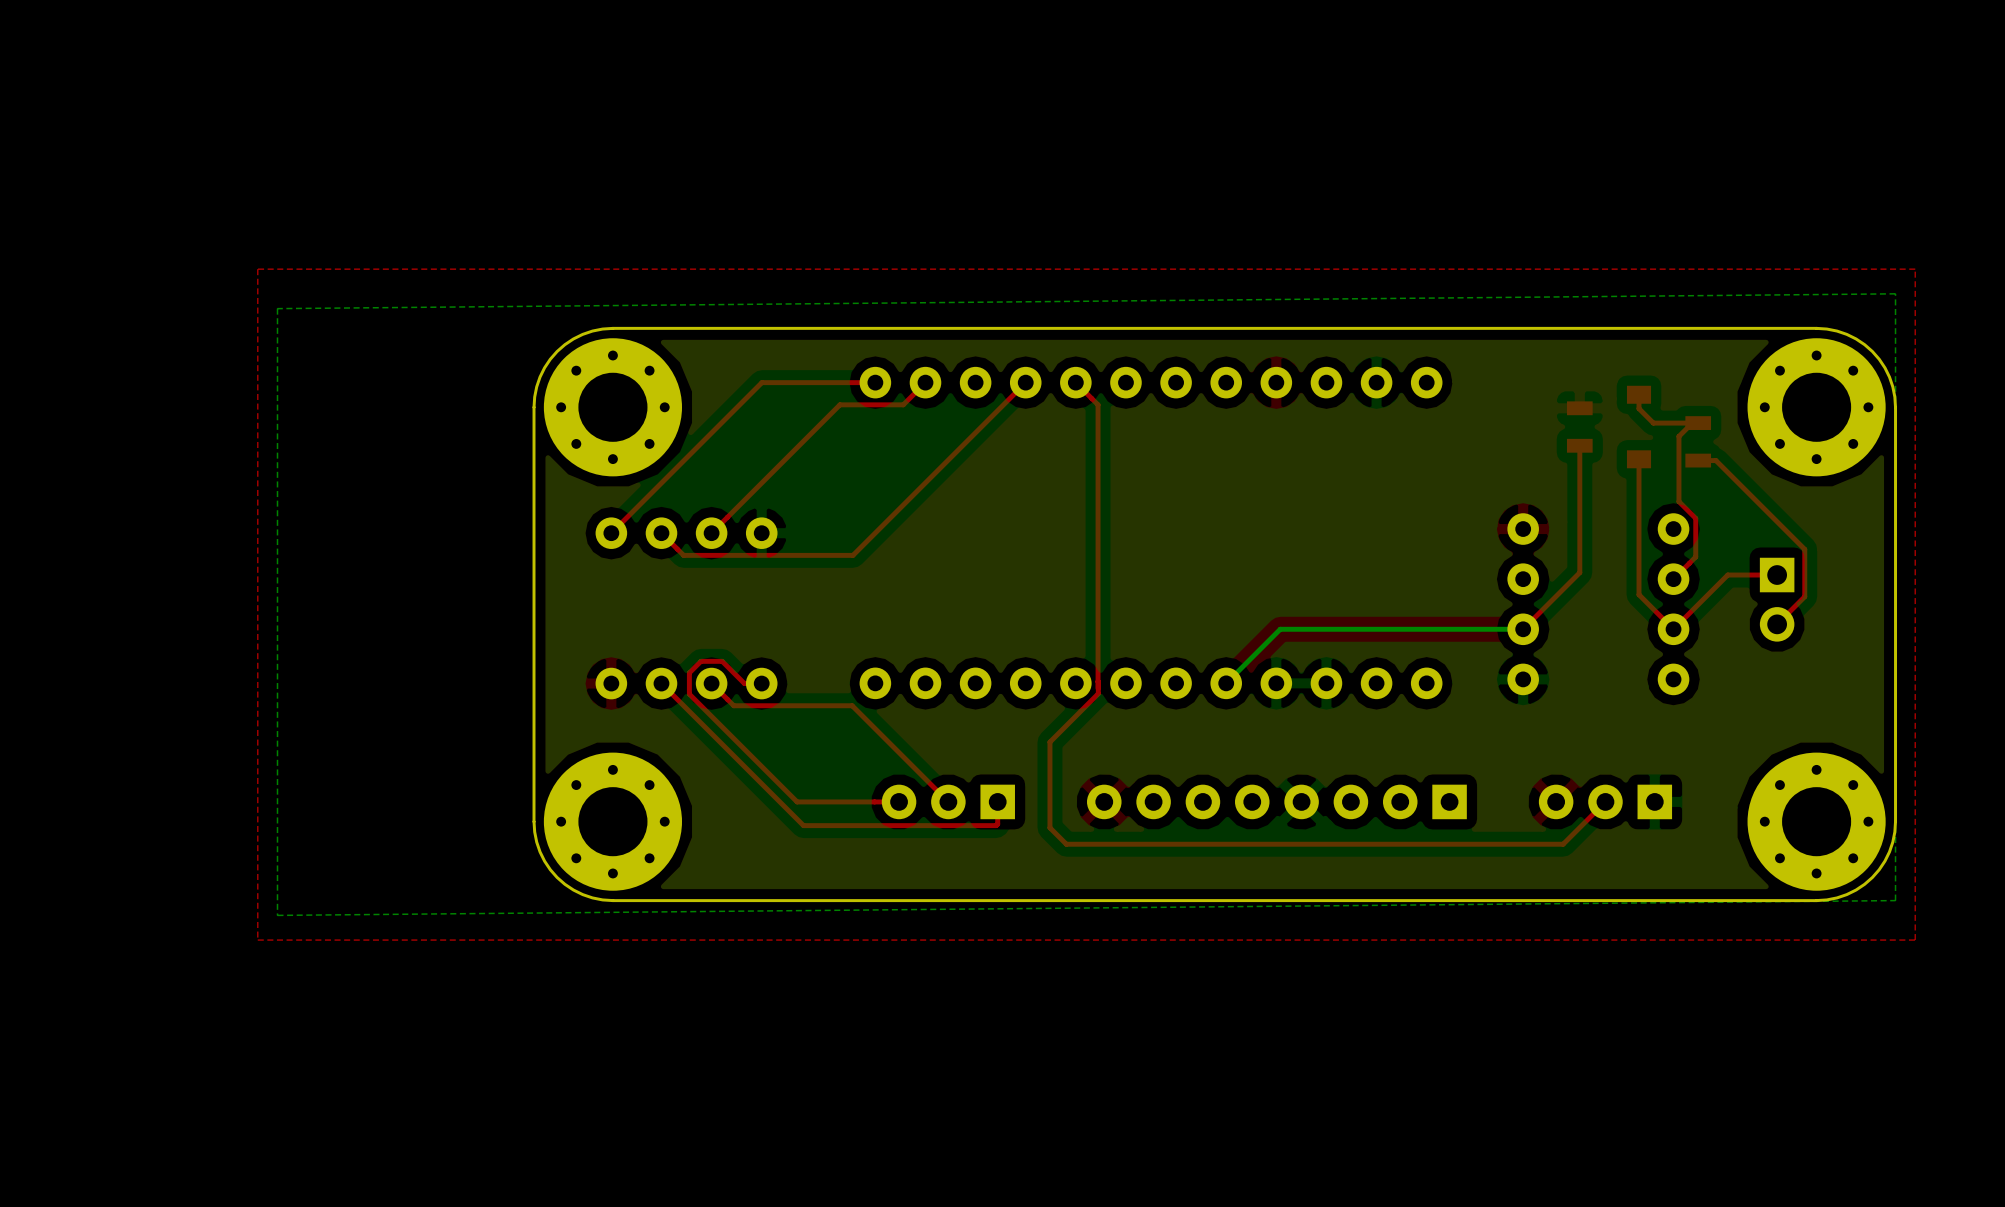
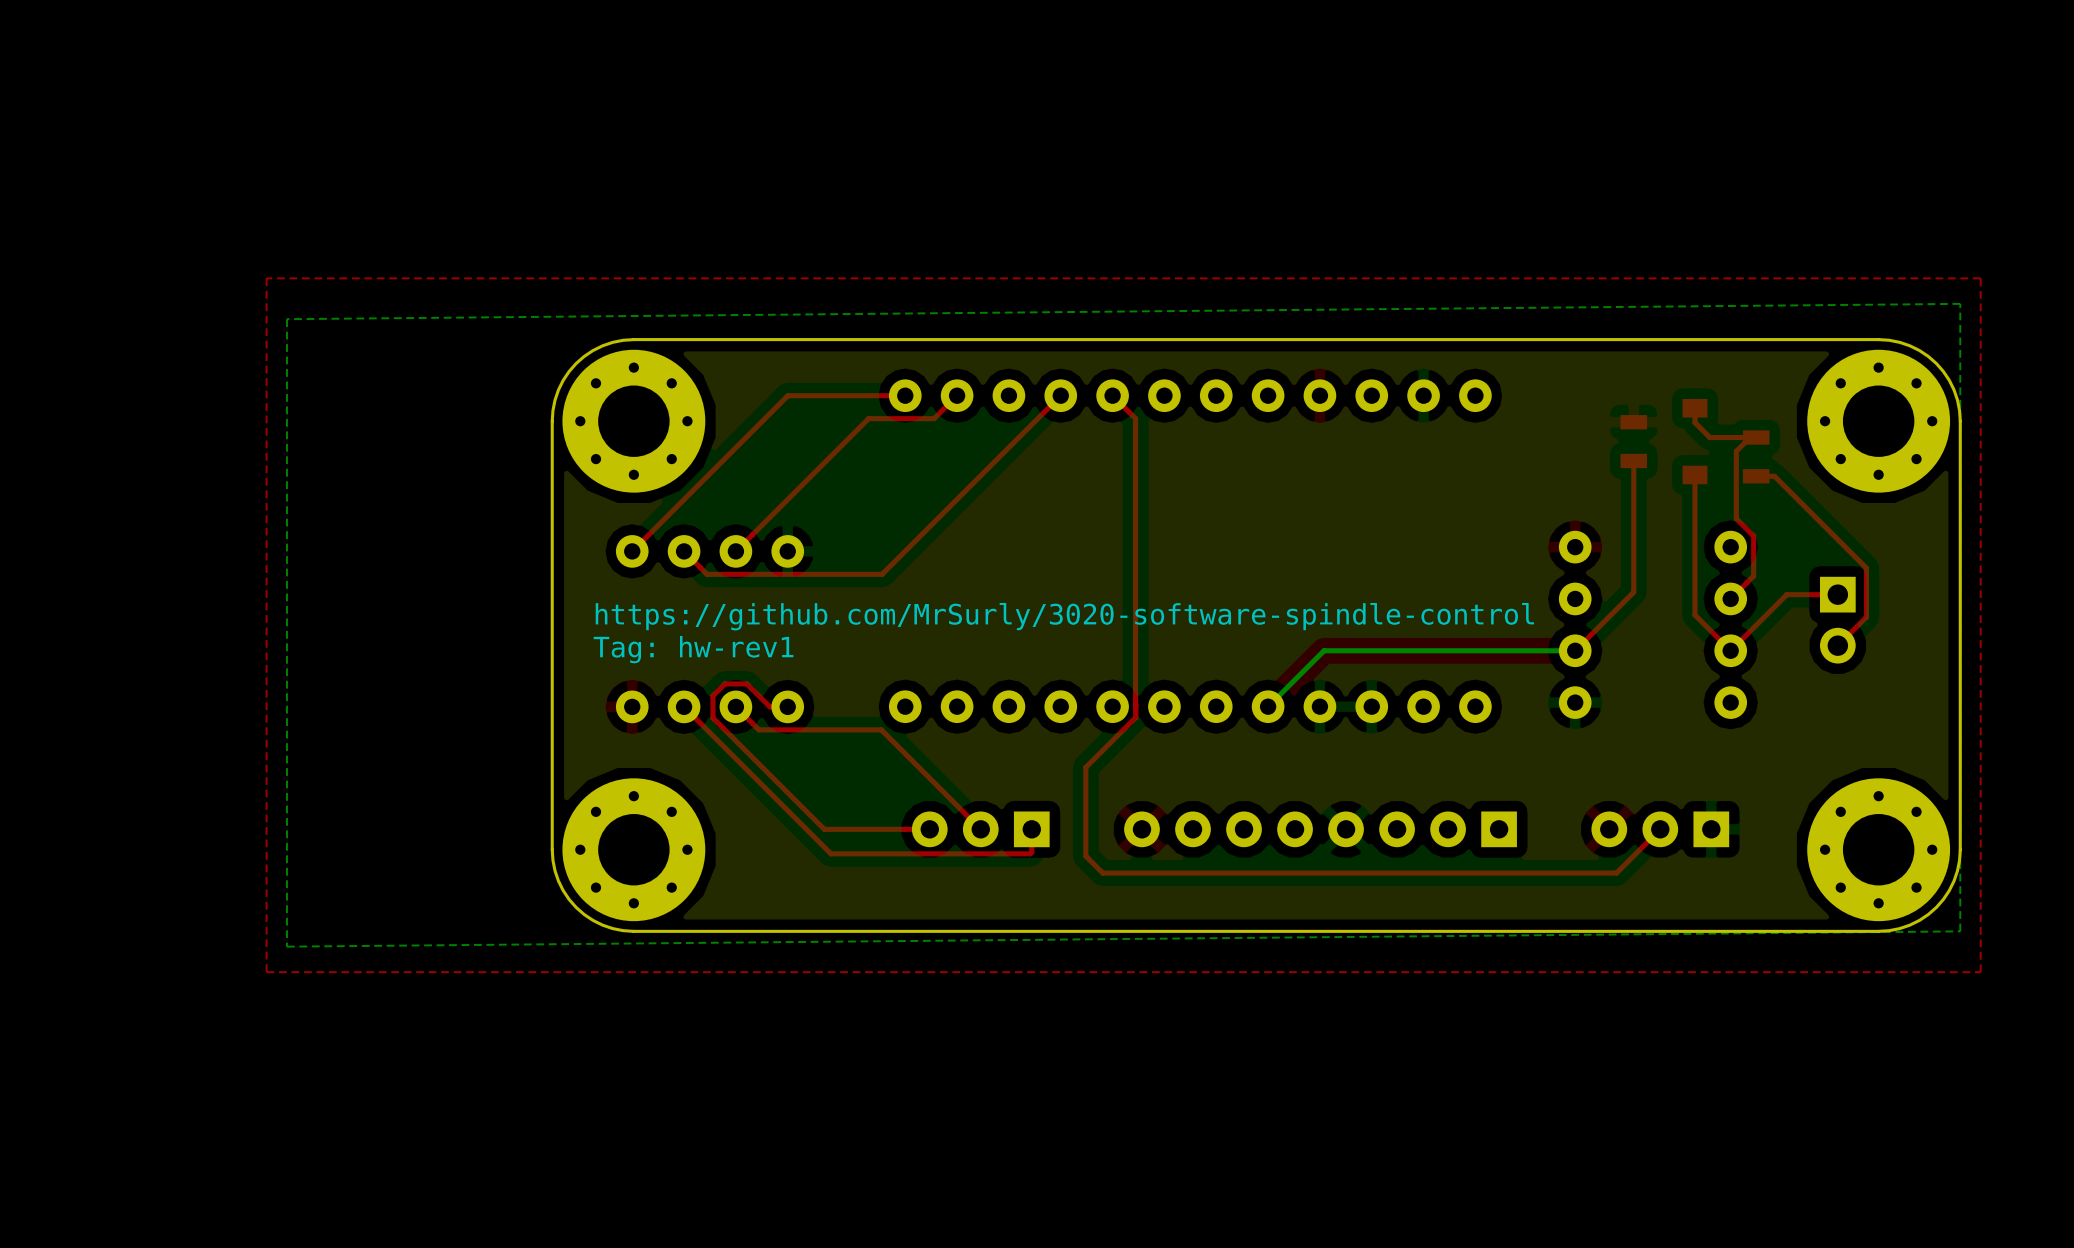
text: none -> https://github.com/MrSurly/3020-software-spindle-control (1064, 616)
text: none -> Tag: hw-rev1 (693, 649)

